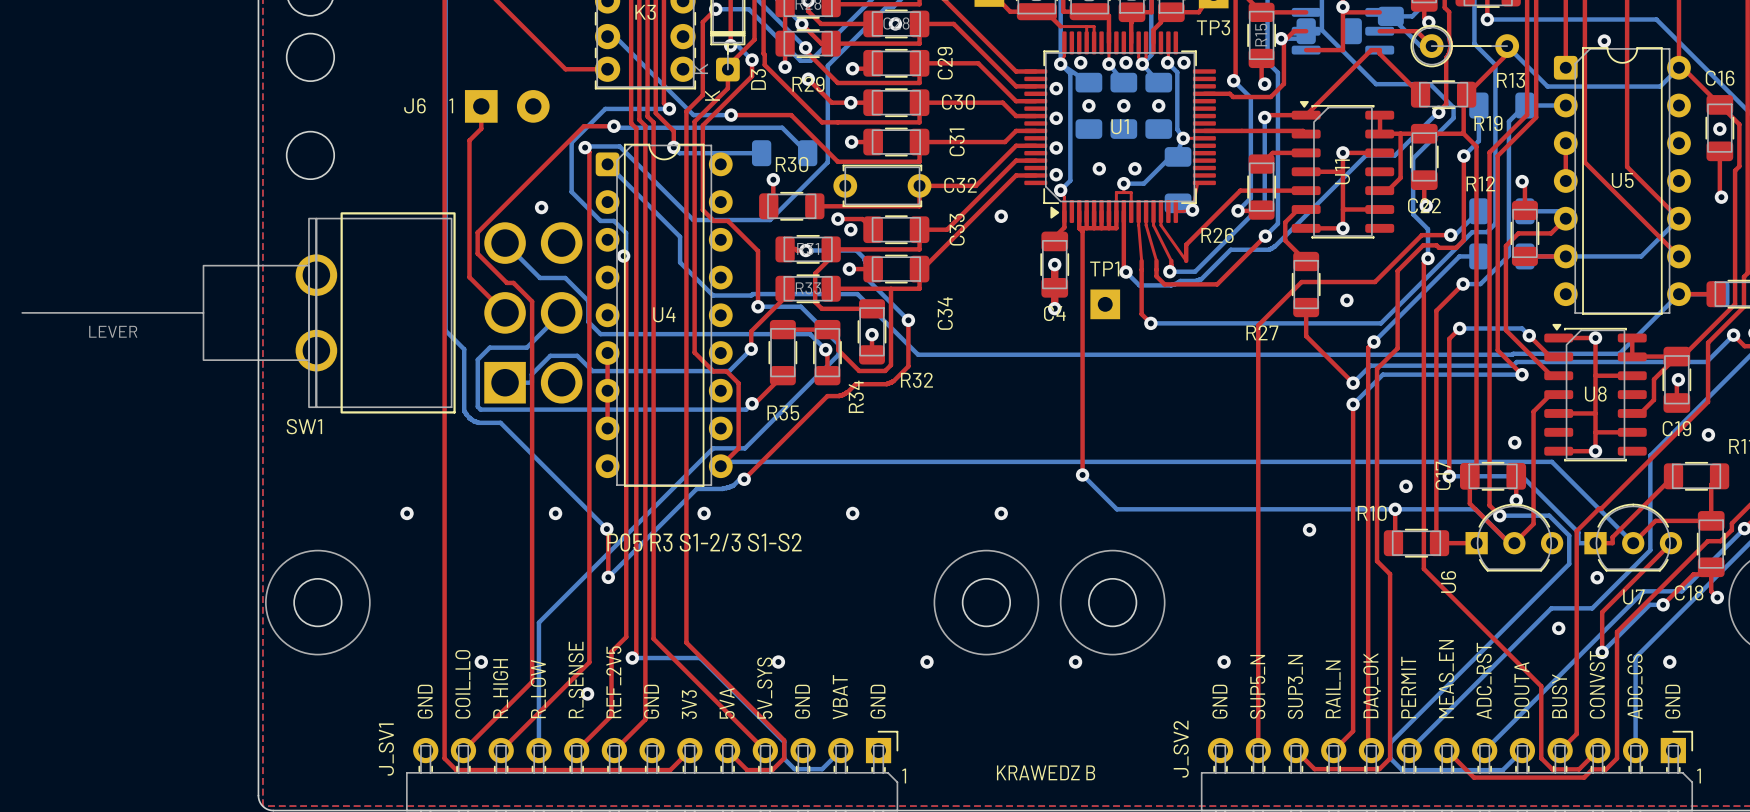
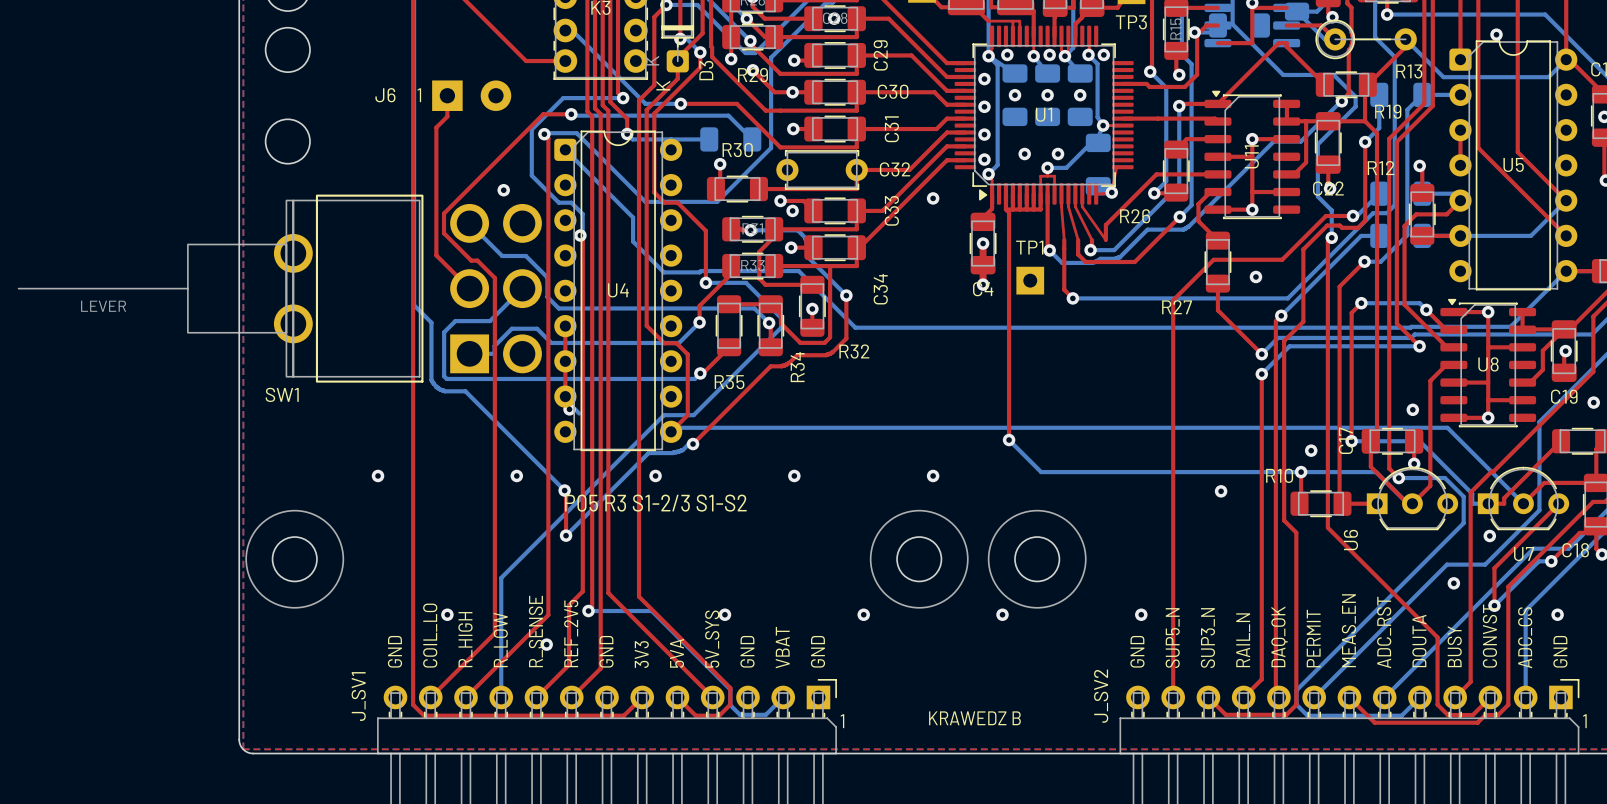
bottom track: none -> (569, 409) (575, 409) (579, 413)
via: none -> (569, 409)

